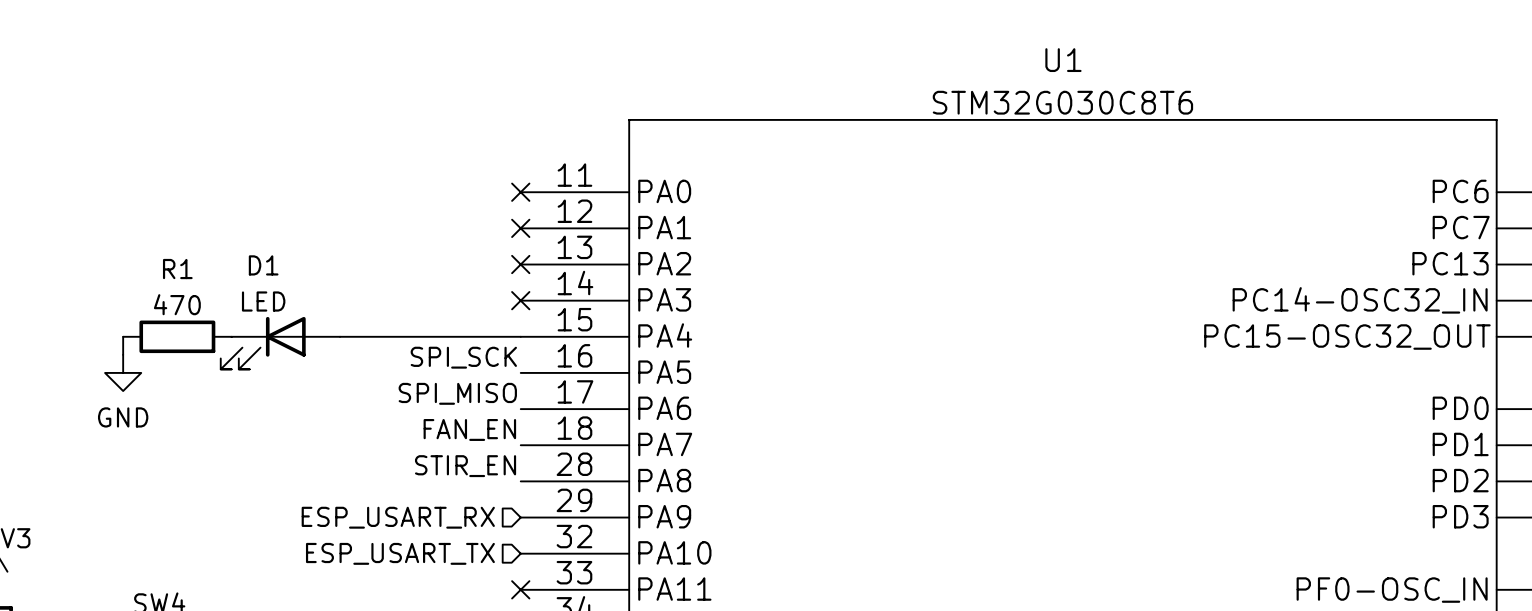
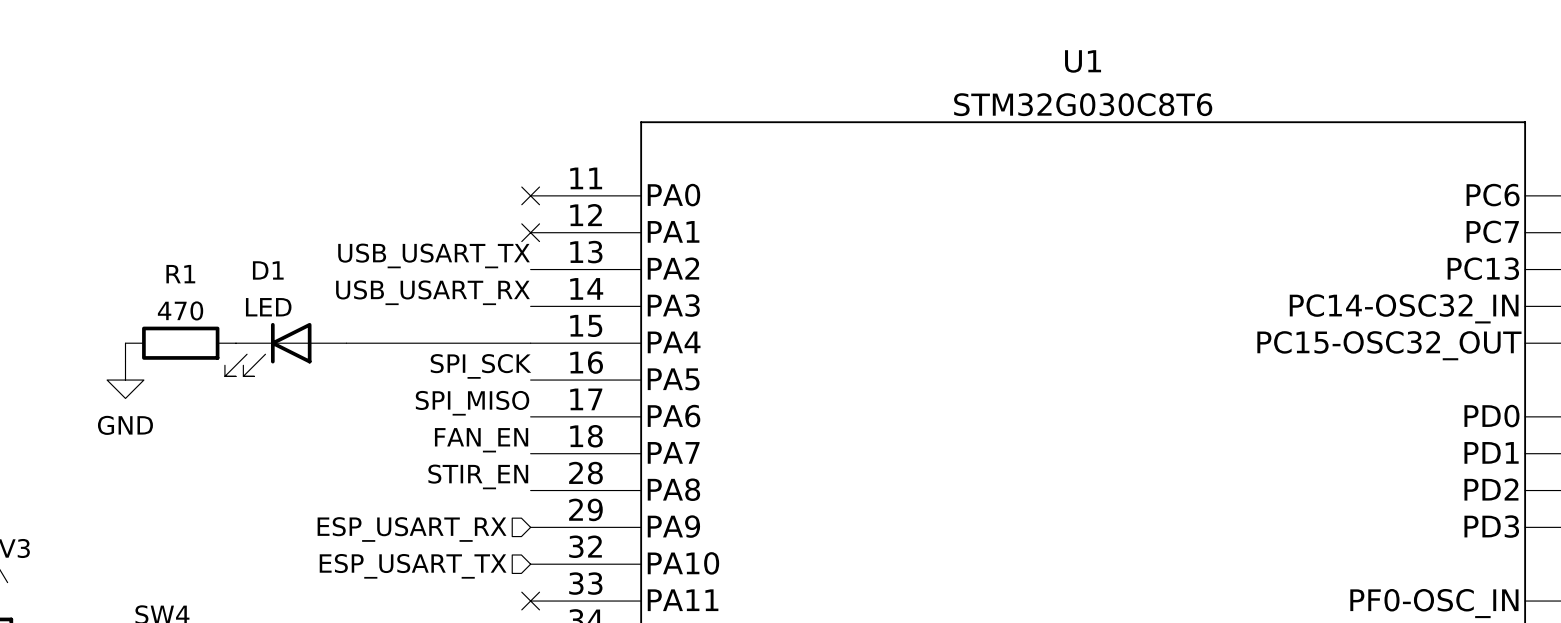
label: none -> USB_USART_TX (434, 255)
no-connect mark: (520, 264) -> none
label: none -> USB_USART_RX (432, 292)
no-connect mark: (520, 300) -> none

